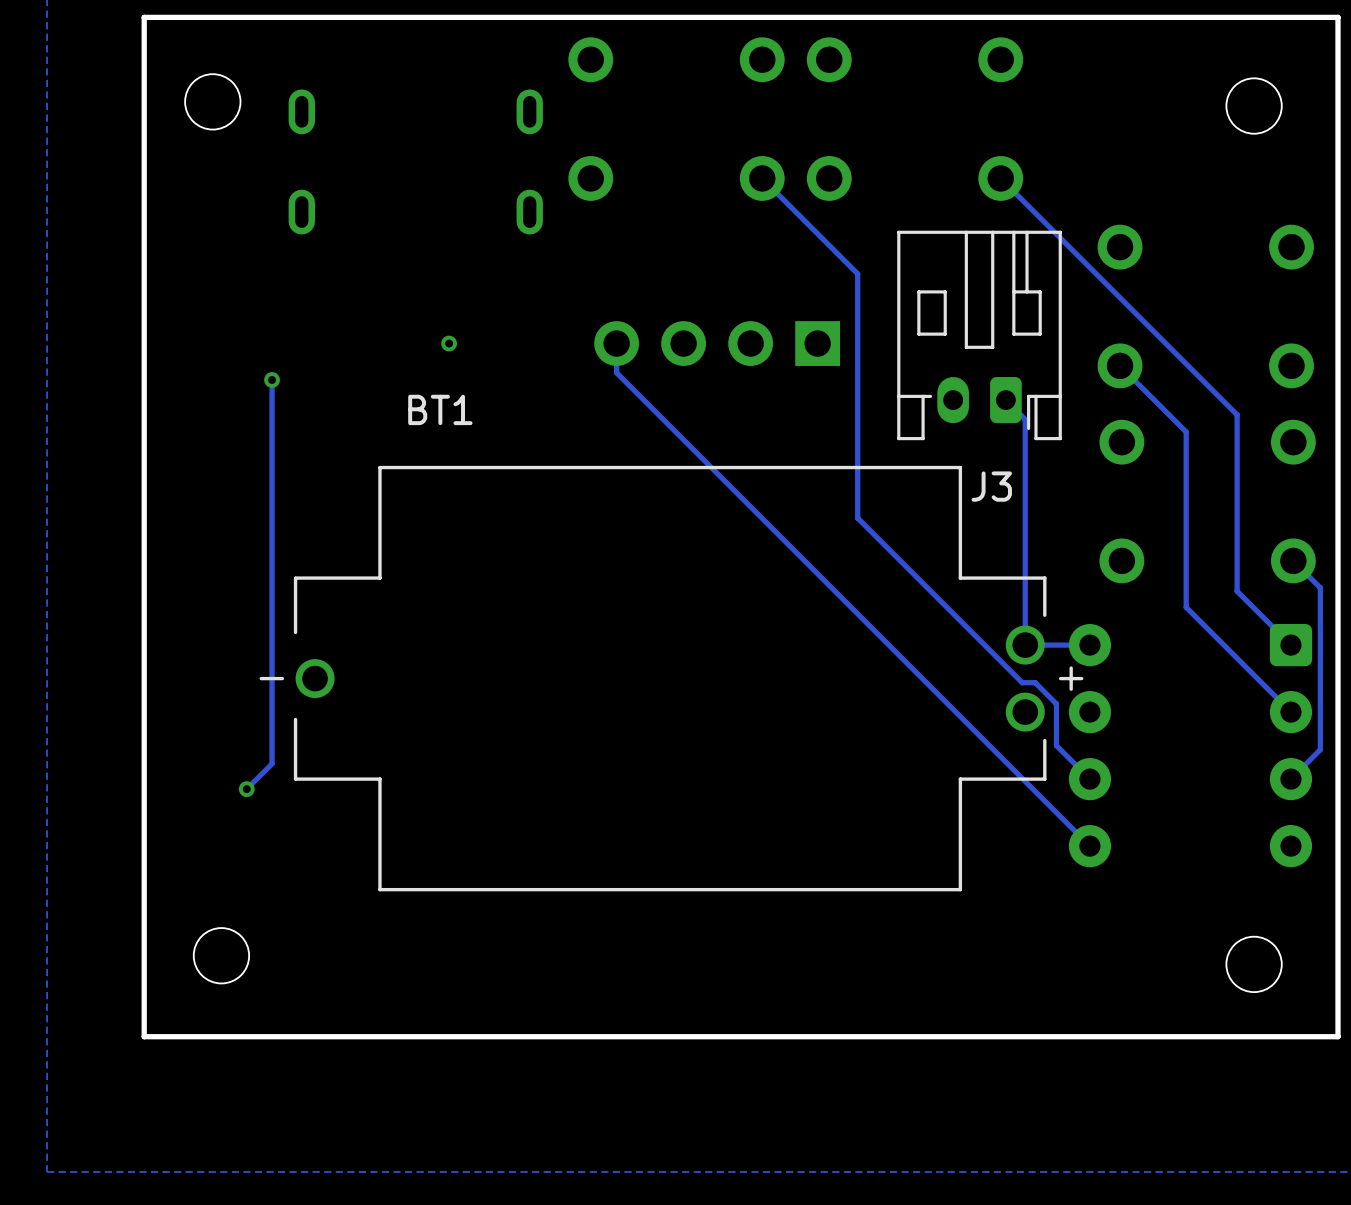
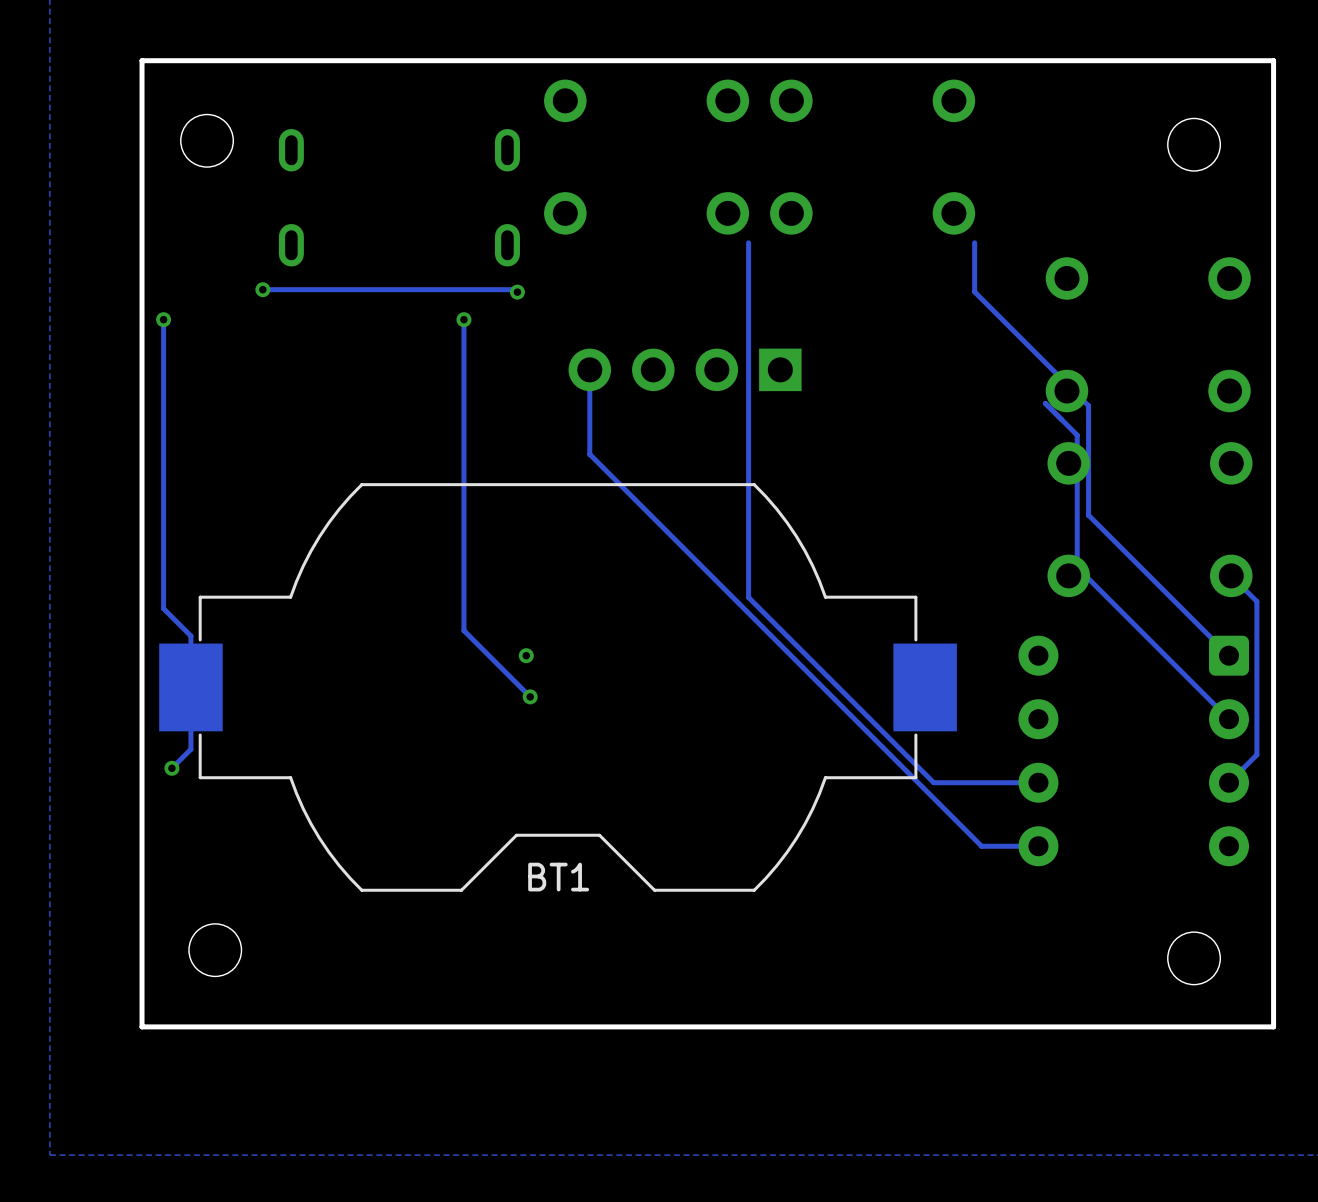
track: (762, 178) (857, 273) (857, 518) (1022, 682) (1035, 682) (1056, 703) (1056, 745) (1089, 779) -> (748, 242) (748, 597) (933, 782) (1038, 782)
track: (1000, 178) (1237, 414) (1237, 591) (1290, 645) -> (974, 242) (974, 291) (1088, 405) (1088, 515) (1229, 655)
track: none -> (262, 289) (514, 289) (517, 292)
via: none -> (262, 289)
via: none -> (517, 292)
track: none -> (163, 319) (163, 608) (190, 636) (190, 749) (171, 768)
via: none -> (163, 319)
track: none -> (463, 319) (463, 630) (530, 696)
via: none -> (463, 319)
J3: (979, 335) -> none
via: (449, 343) -> none
track: (1120, 365) (1186, 431) (1186, 607) -> (1045, 403) (1077, 435) (1077, 567) (1129, 619)
track: (616, 372) (1089, 846) -> (589, 397) (589, 454) (981, 846) (1038, 846)
track: (272, 379) (272, 763) (246, 789) -> none
via: (272, 379) -> none
track: (1005, 400) (1025, 419) (1025, 645) (1089, 645) -> none
BT1 name position: BT1 (440, 409) -> BT1 (558, 877)
BT1 footprint: [259, 465, 1084, 892] -> [159, 483, 957, 892]
via: none -> (526, 655)
via: none -> (530, 696)
via position: (246, 789) -> (171, 768)

